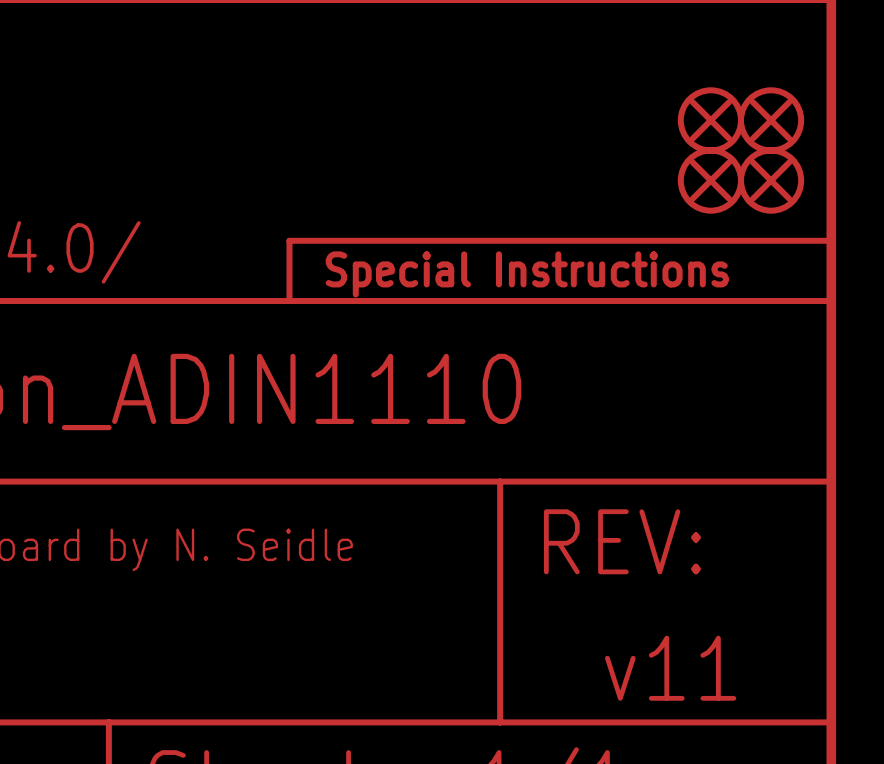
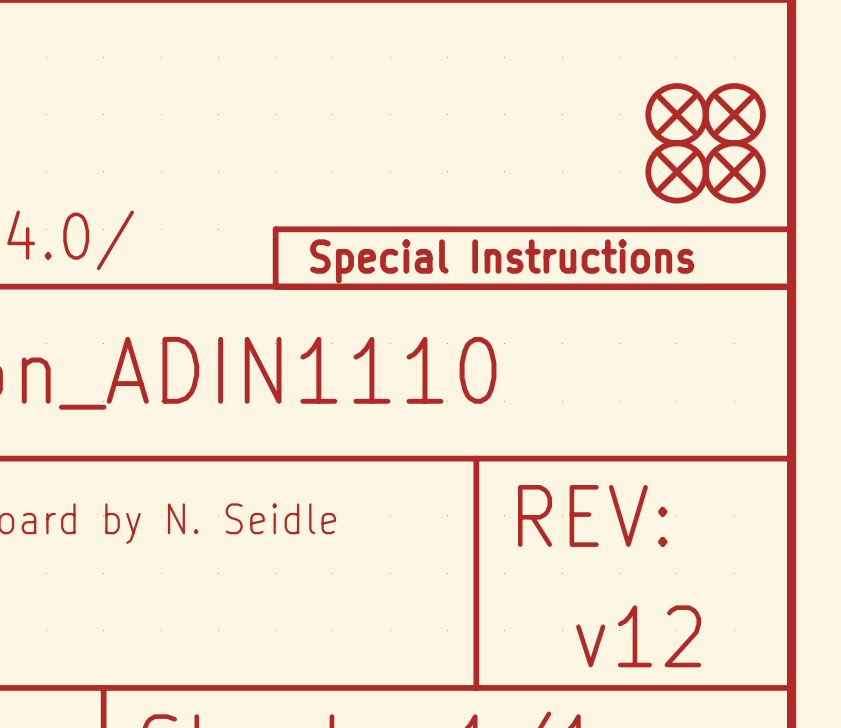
text: v11 (670, 668) -> v12 (638, 636)

